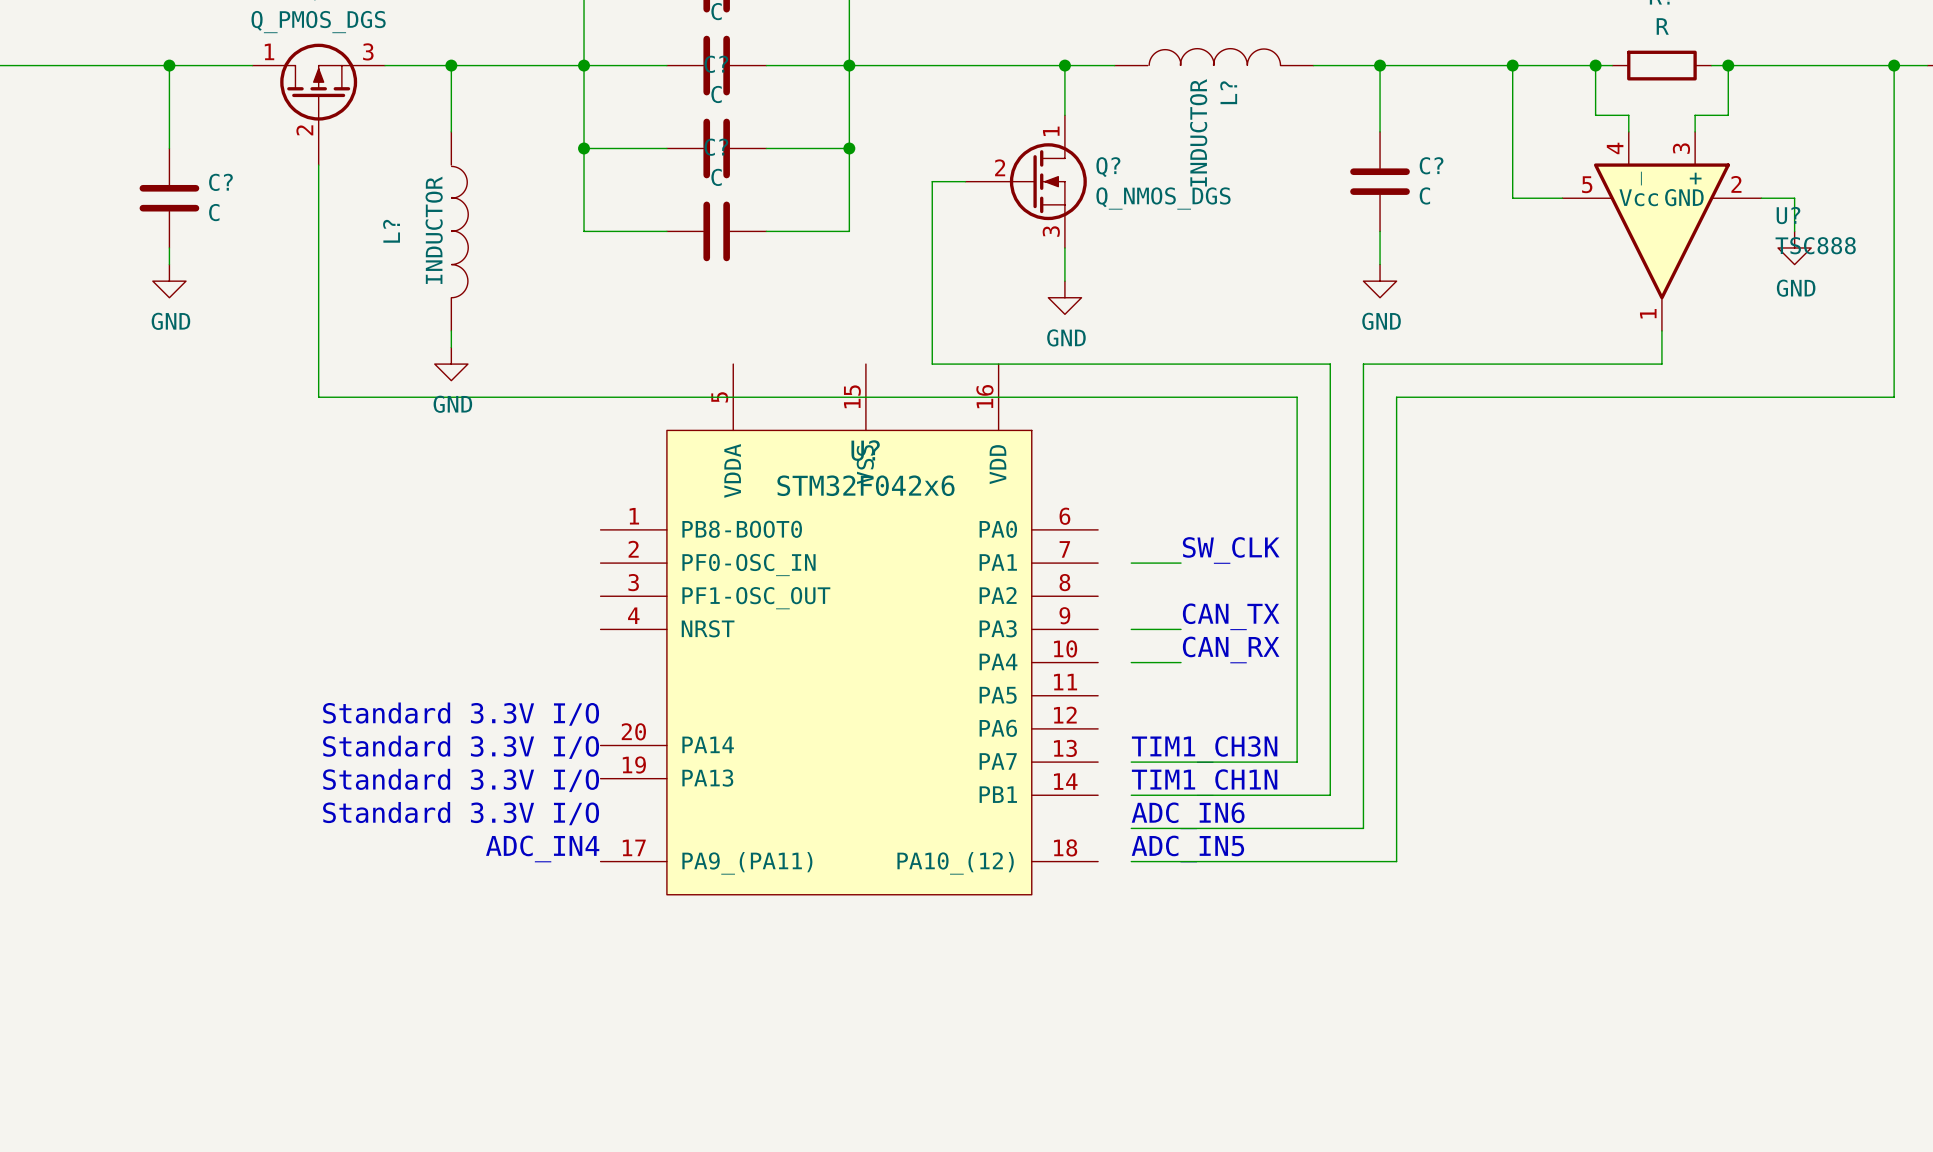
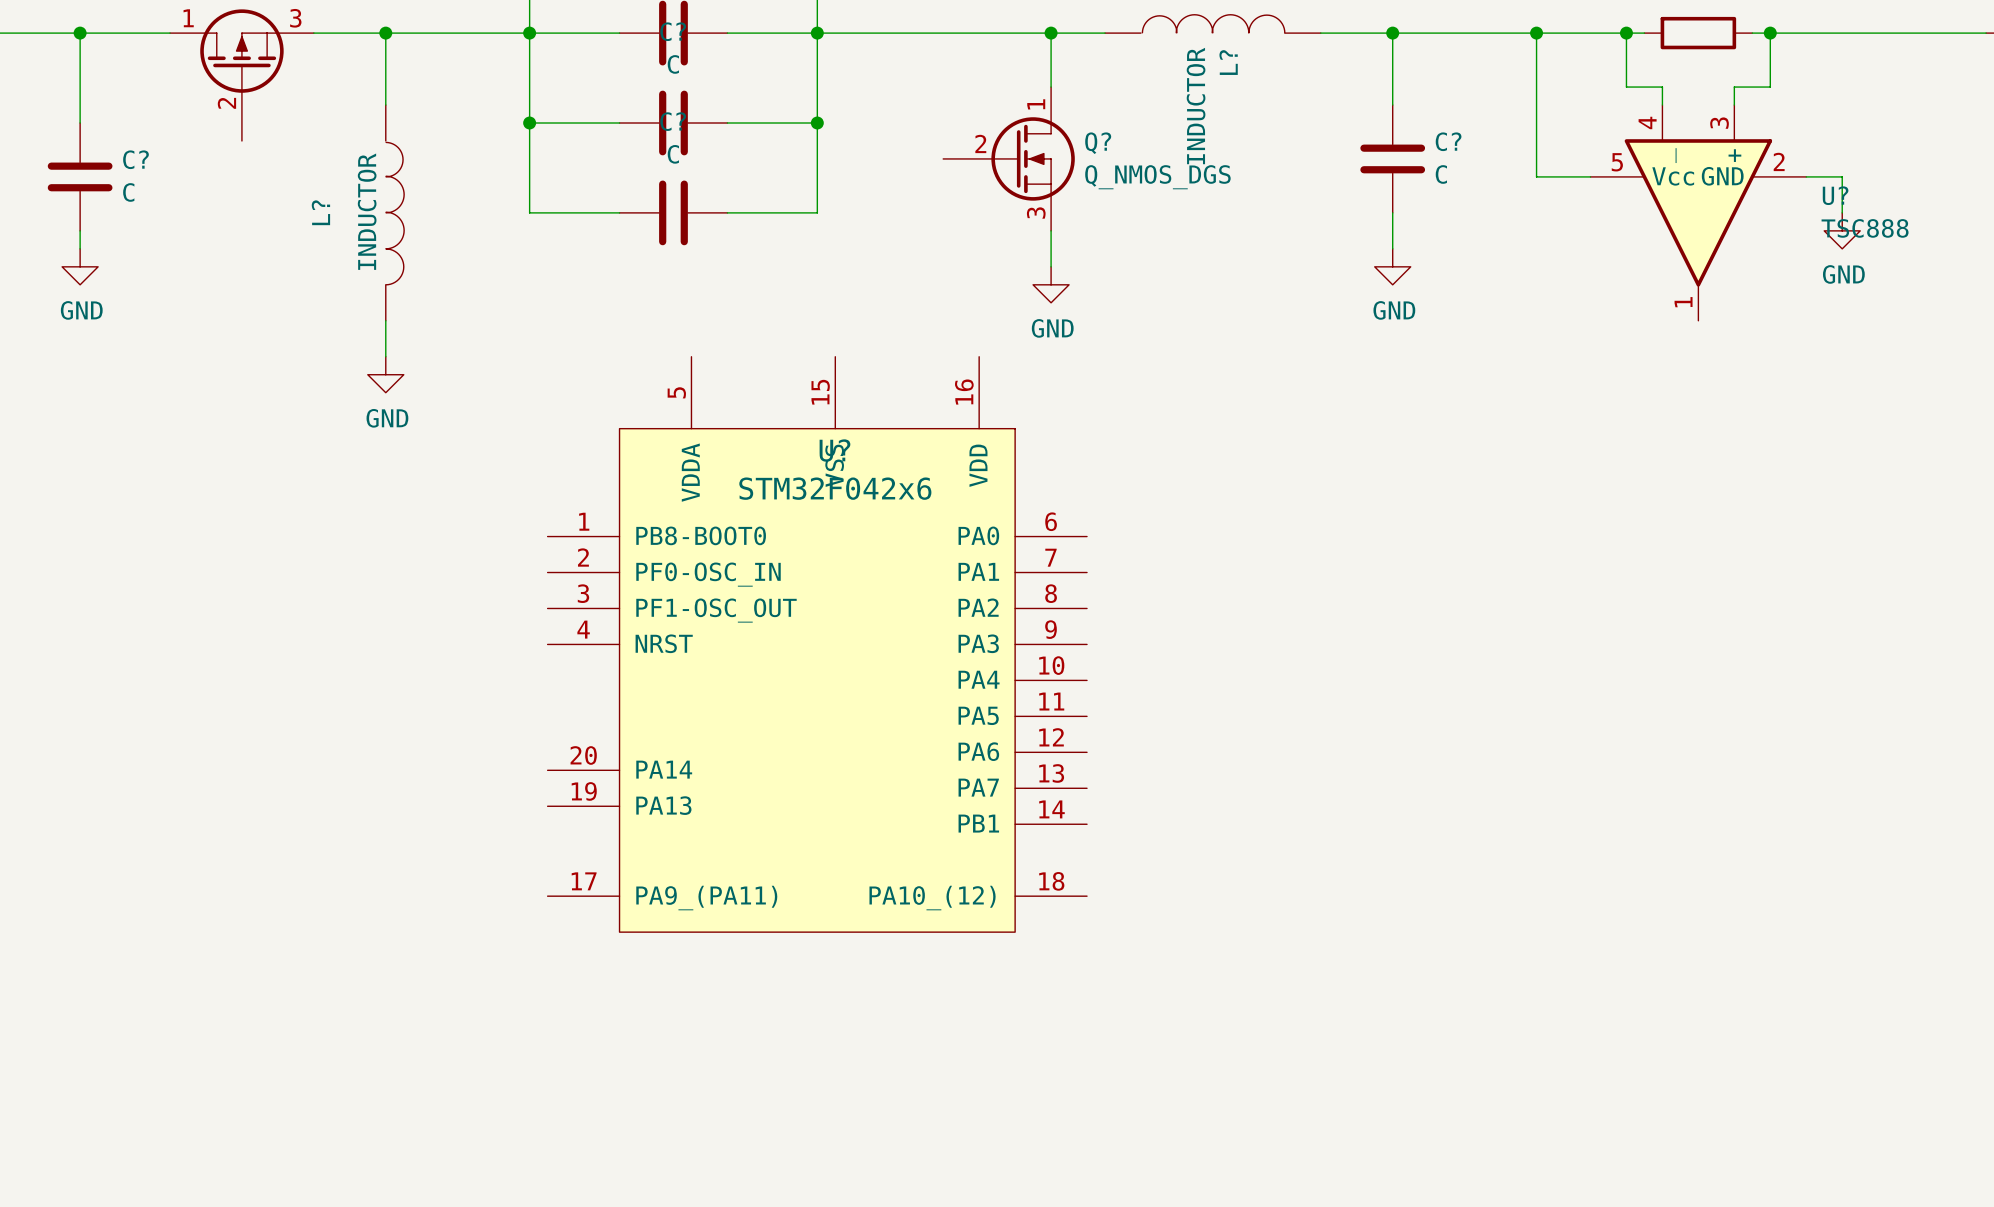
wire: (1894, 65) (1894, 397) (1396, 397) (1396, 861) (1131, 861) -> none
junction: (1894, 65) -> none
wire: (318, 165) (318, 397) (1297, 397) (1297, 762) (1131, 762) -> none
wire: (965, 181) (932, 181) (932, 364) (1330, 364) (1330, 795) (1131, 795) -> none
wire: (1661, 330) (1661, 364) (1363, 364) (1363, 828) (1131, 828) -> none
power symbol position: GND (451, 364) -> GND (385, 374)
text: SW_CLK (1231, 550) -> none
wire: (1131, 563) (1181, 563) -> none
text: CAN_TX (1231, 616) -> none
wire: (1131, 629) (1181, 629) -> none
text: CAN_RX (1231, 649) -> none
wire: (1131, 662) (1181, 662) -> none
text: Standard 3.3V I/O (461, 714) -> none
text: Standard 3.3V I/O (461, 747) -> none
text: TIM1_CH3N (1204, 749) -> none
text: Standard 3.3V I/O (461, 780) -> none
text: TIM1_CH1N (1204, 782) -> none
text: Standard 3.3V I/O (461, 813) -> none
text: ADC_IN6 (1188, 815) -> none
text: ADC_IN4 (542, 848) -> none
text: ADC_IN5 (1187, 848) -> none

